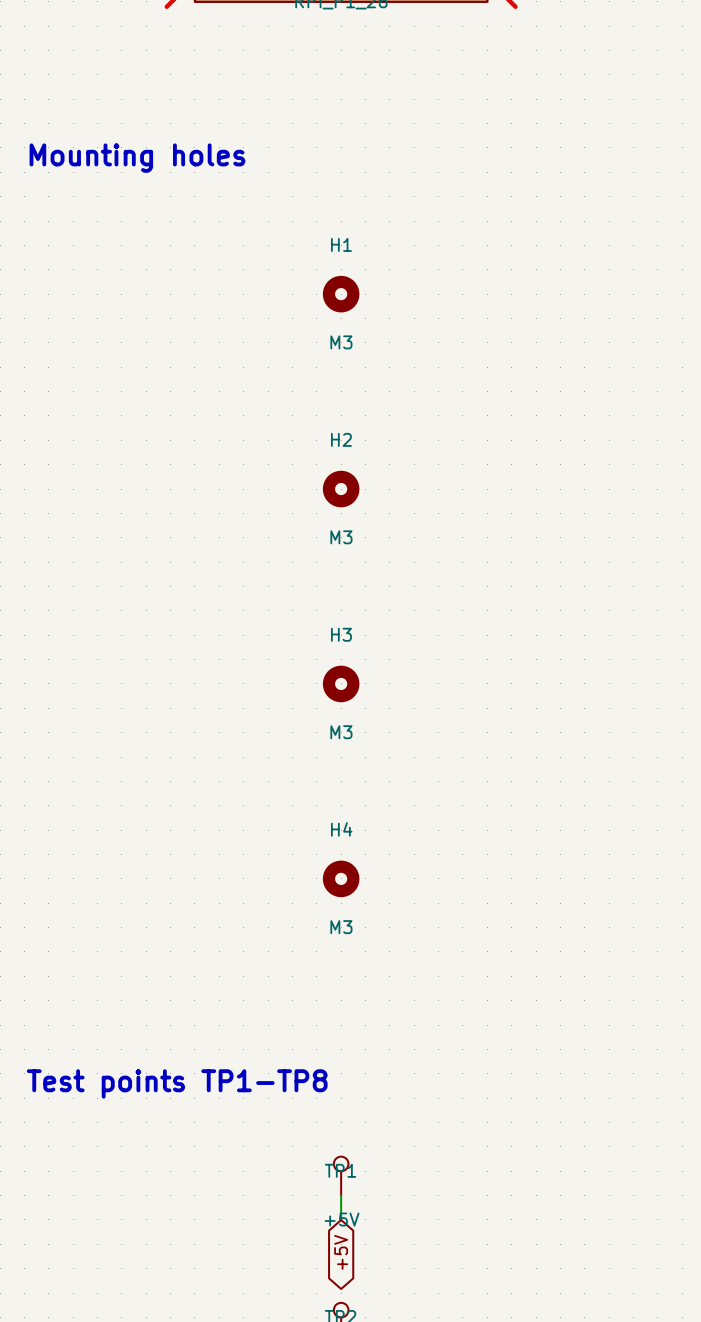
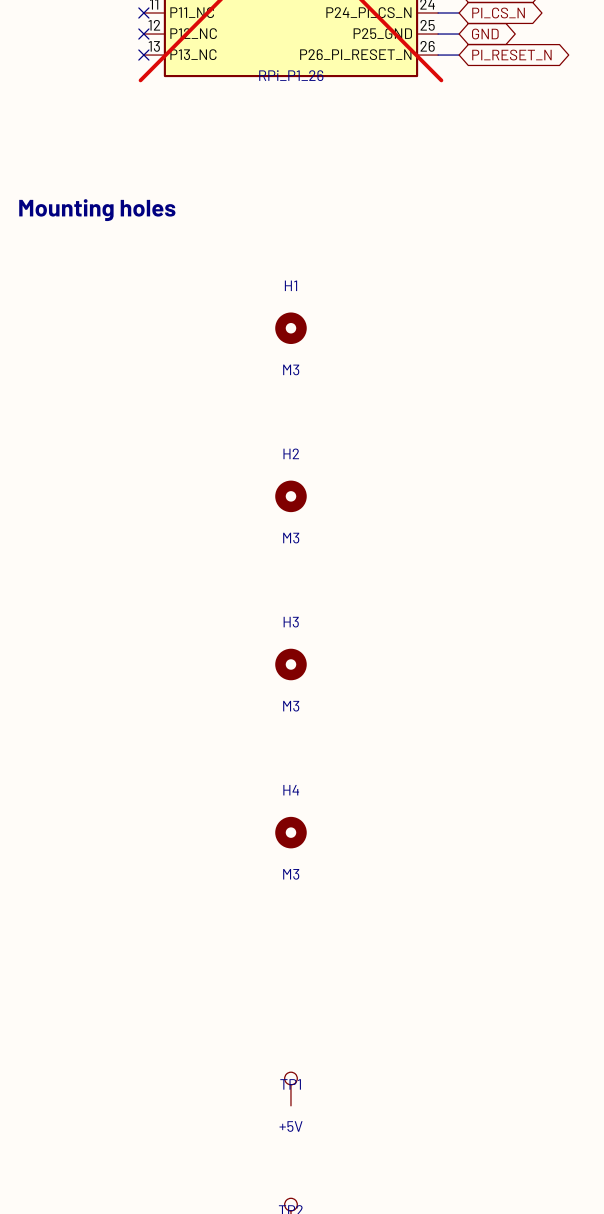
text: Test points TP1-TP8 (177, 1083) -> none
wire: (341, 1195) (341, 1219) -> none
global label: +5V (341, 1252) -> none

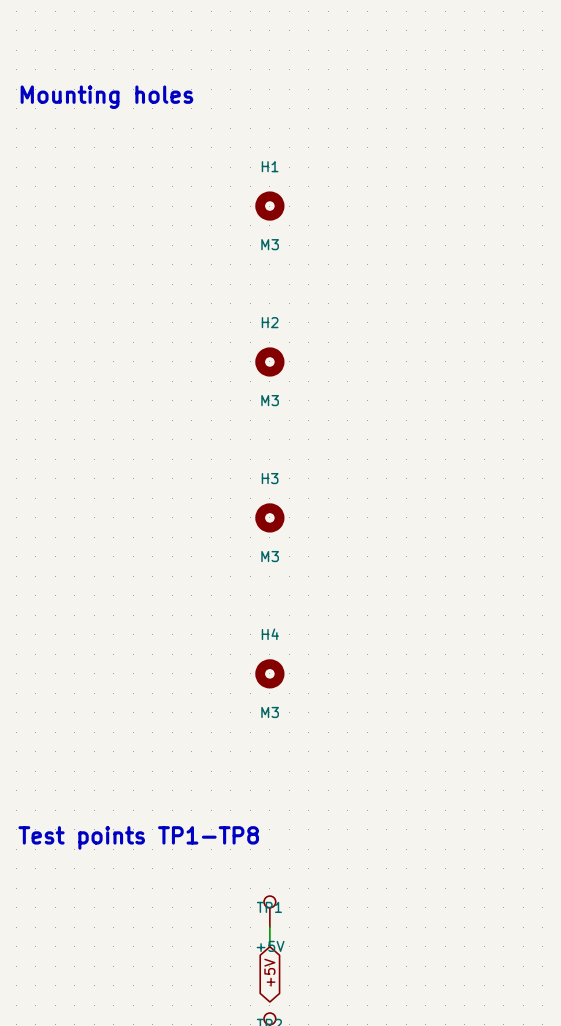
text: none -> Test points TP1-TP8 (138, 837)
wire: none -> (269, 927) (269, 946)
global label: none -> +5V (269, 972)

